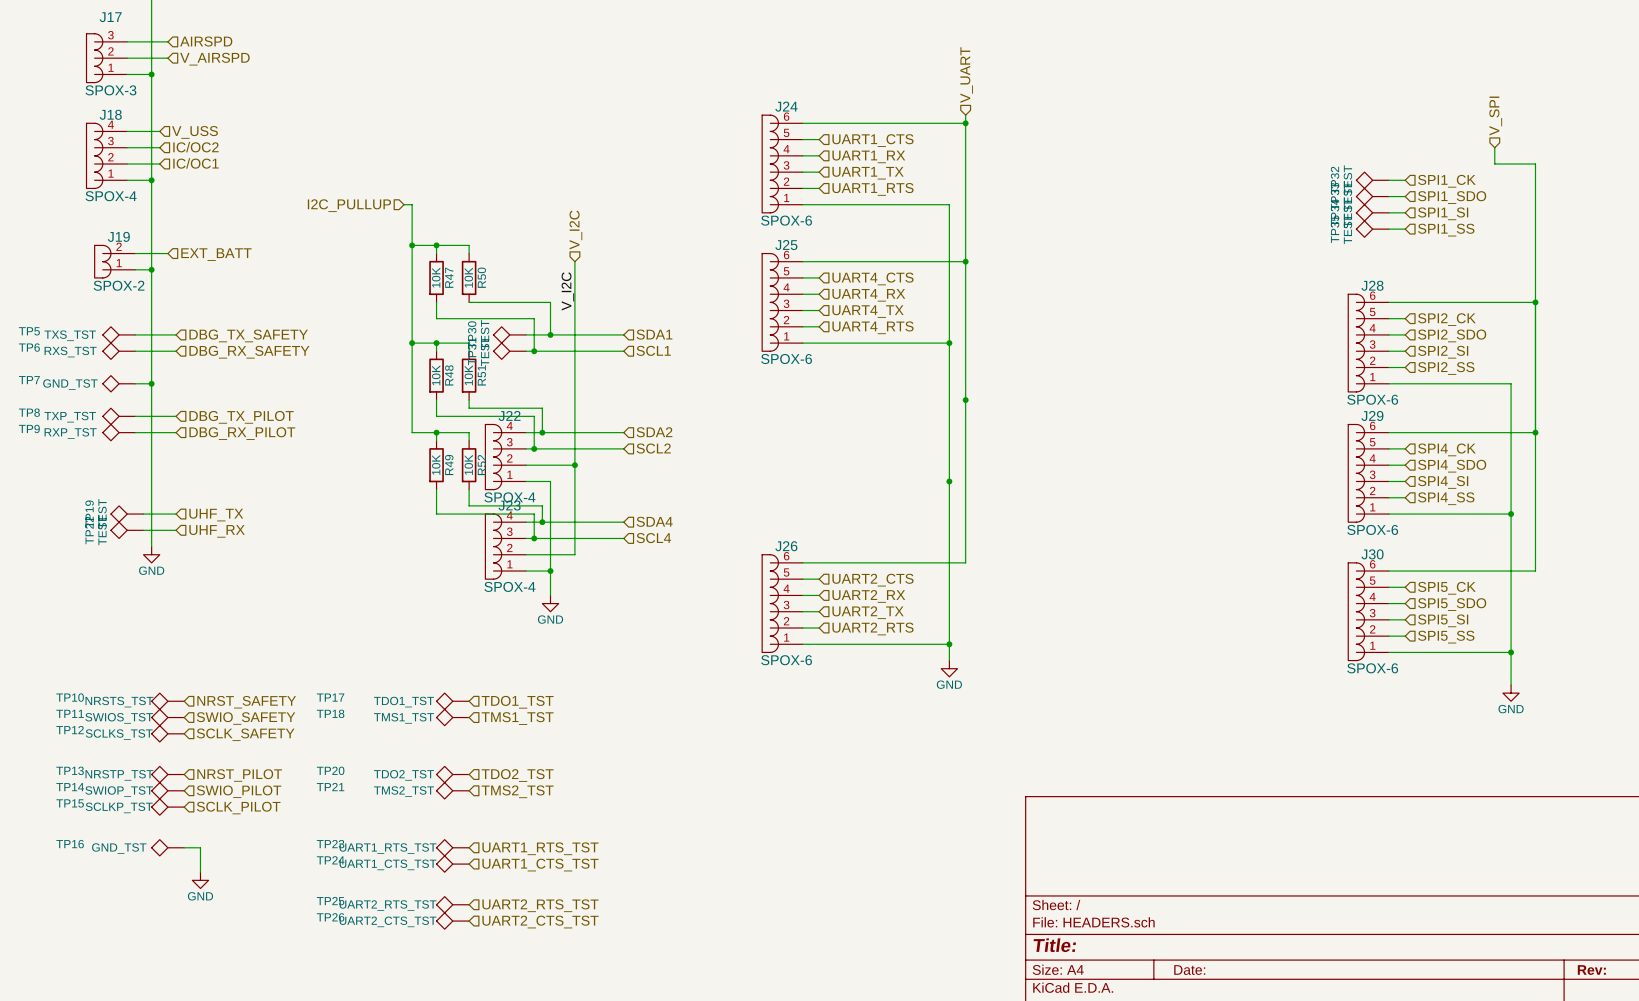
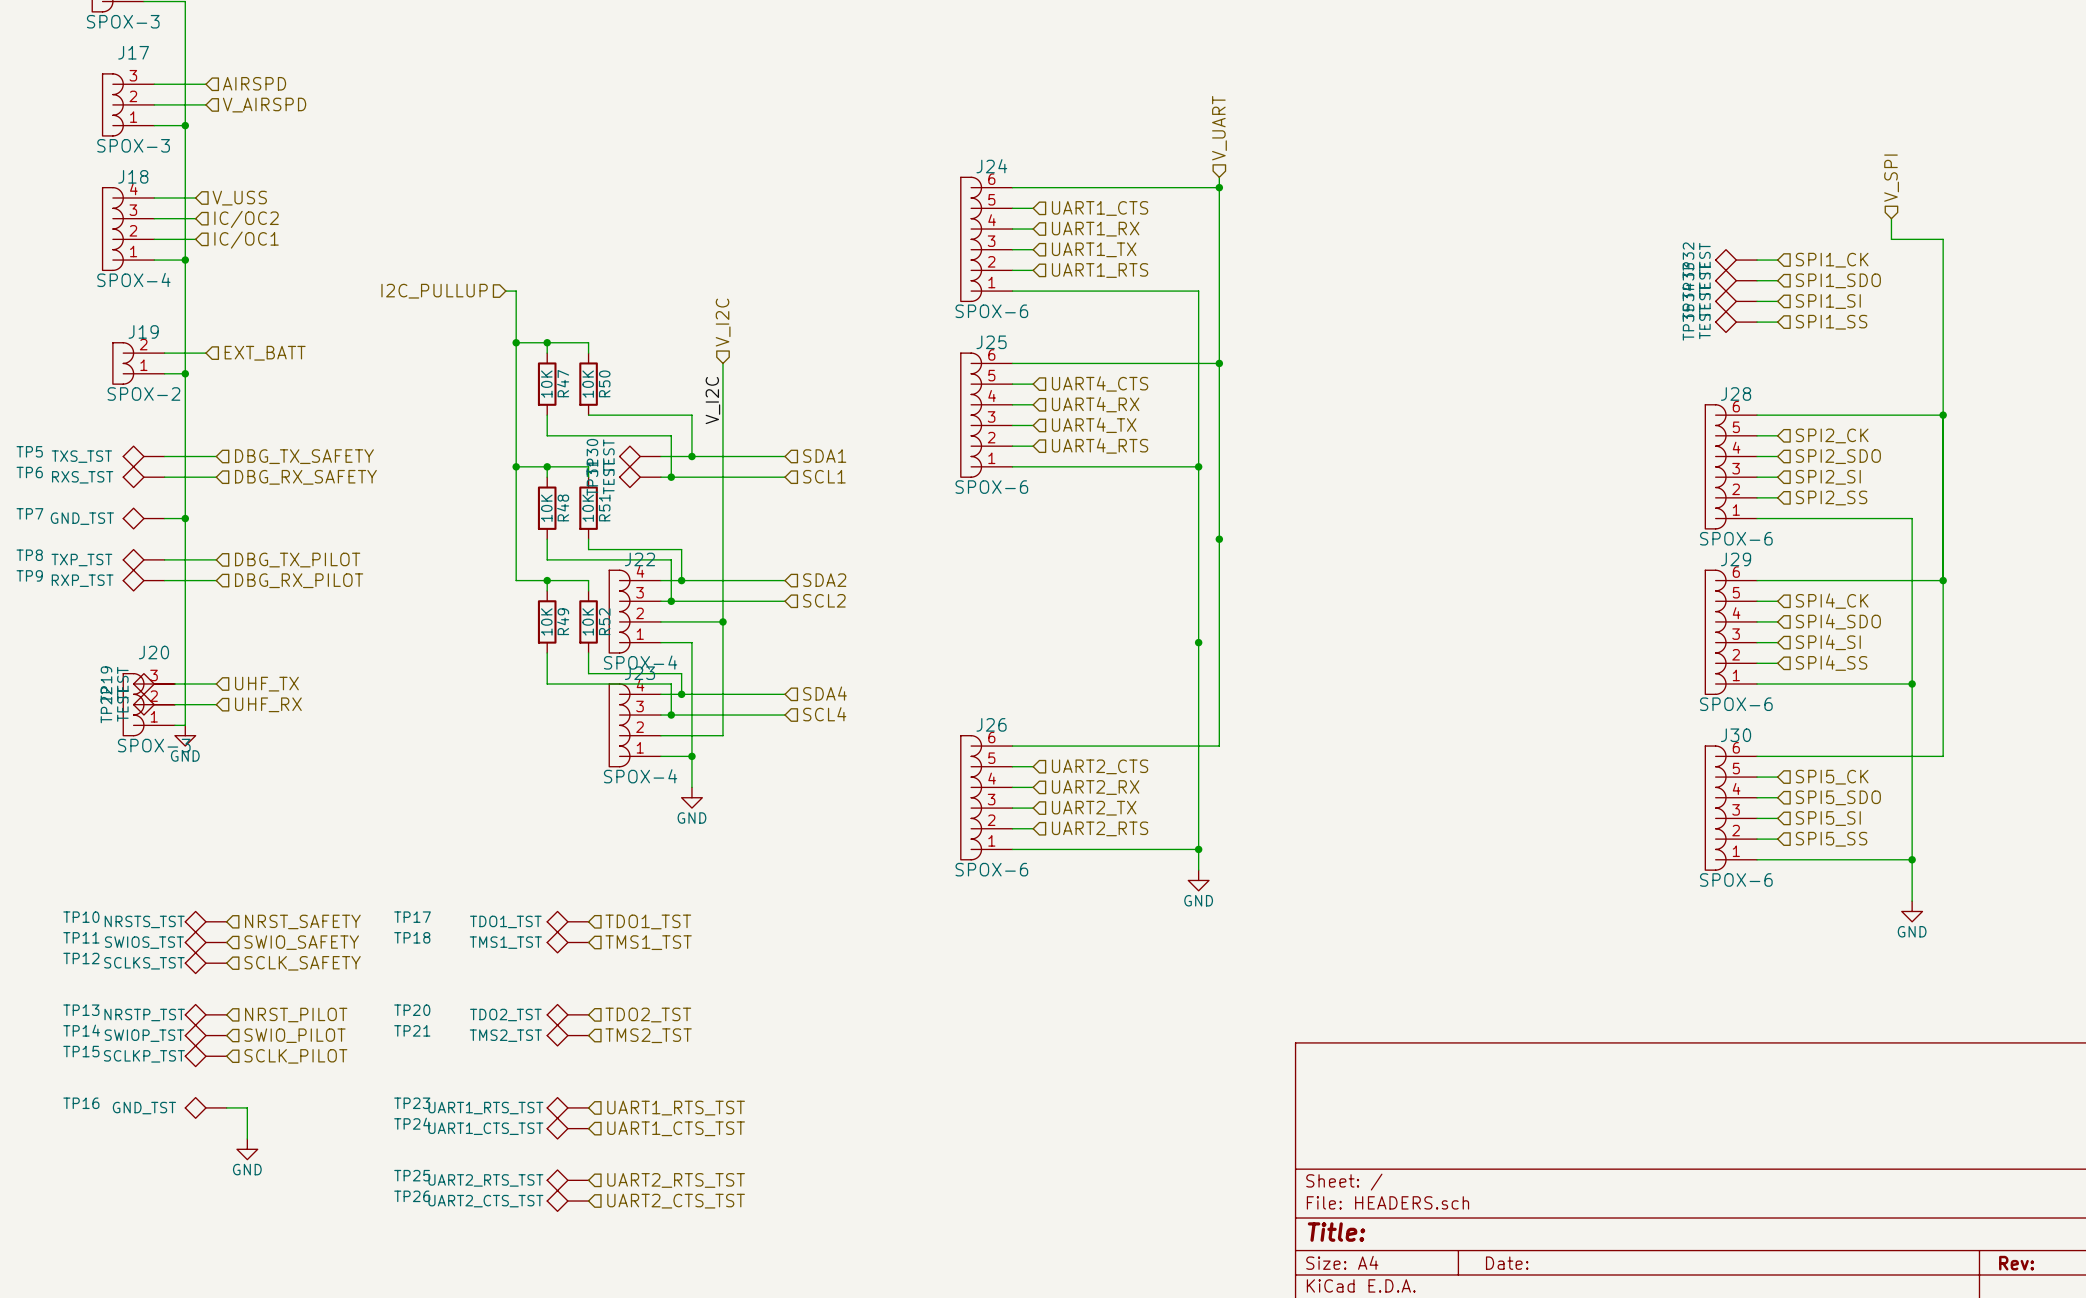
J20: none -> SPOX-3 (149, 704)
wire: none -> (174, 725) (185, 725)

